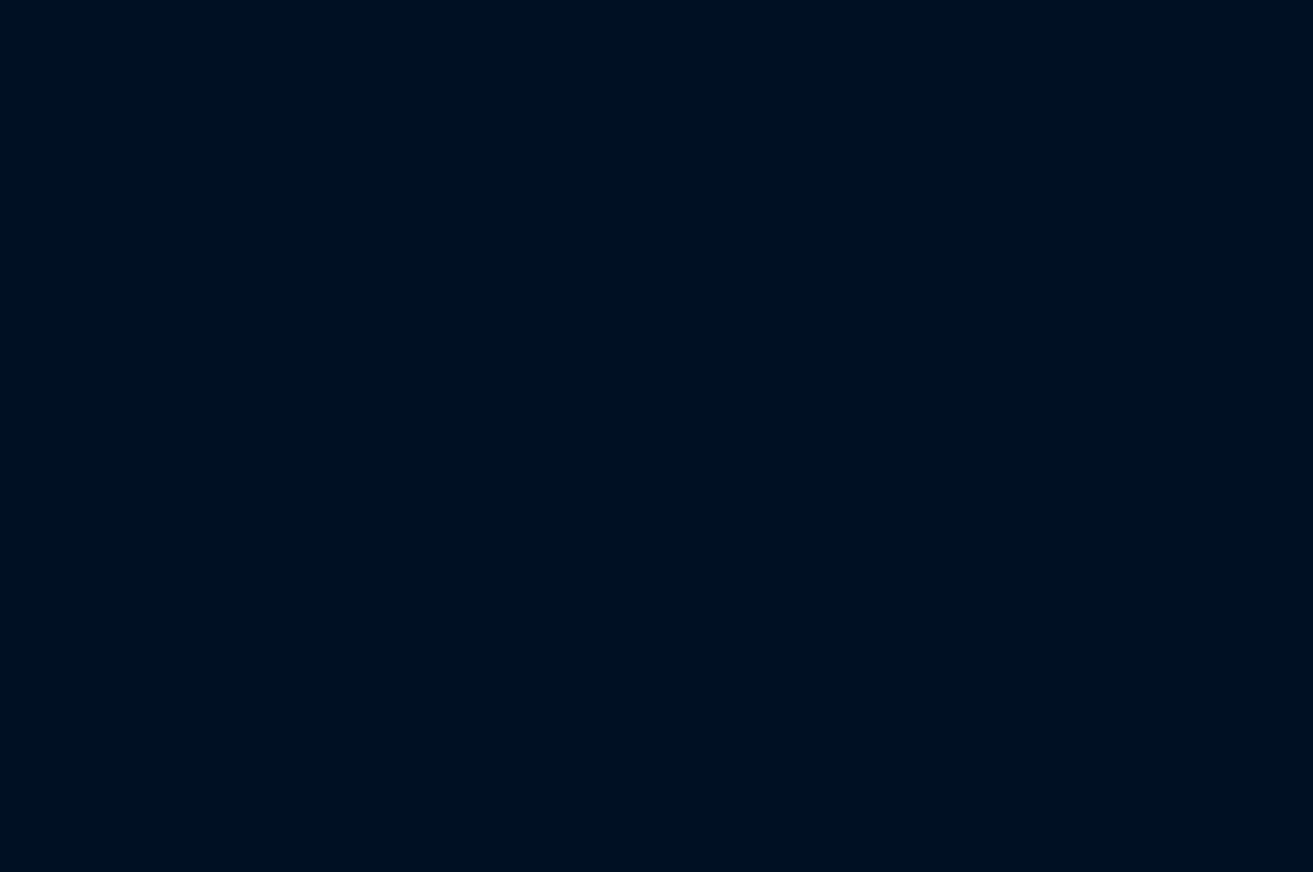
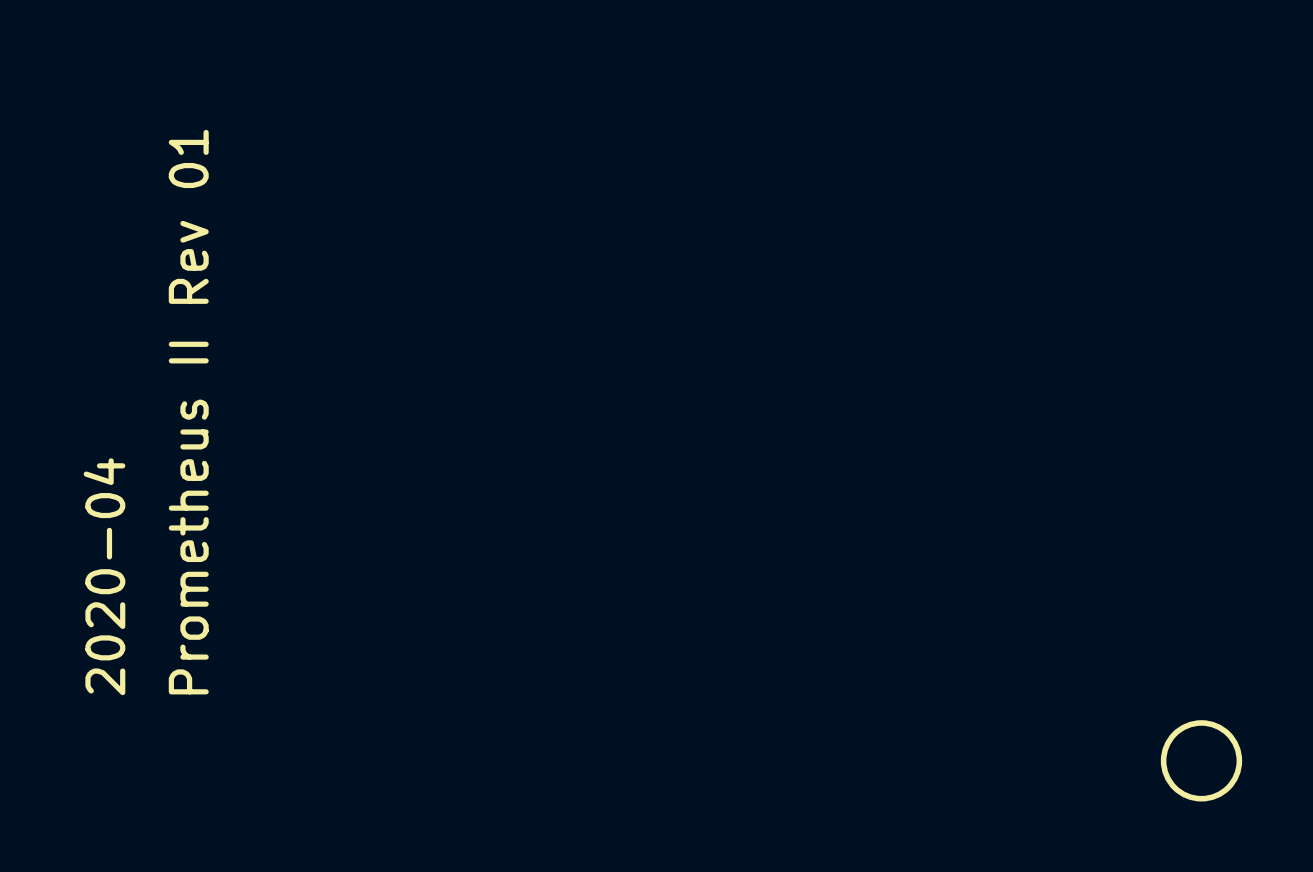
text: none -> Prometheus II Rev 01 (188, 412)
text: none -> 2020-04 (104, 576)
drawing: none -> [1160, 720, 1243, 802]

